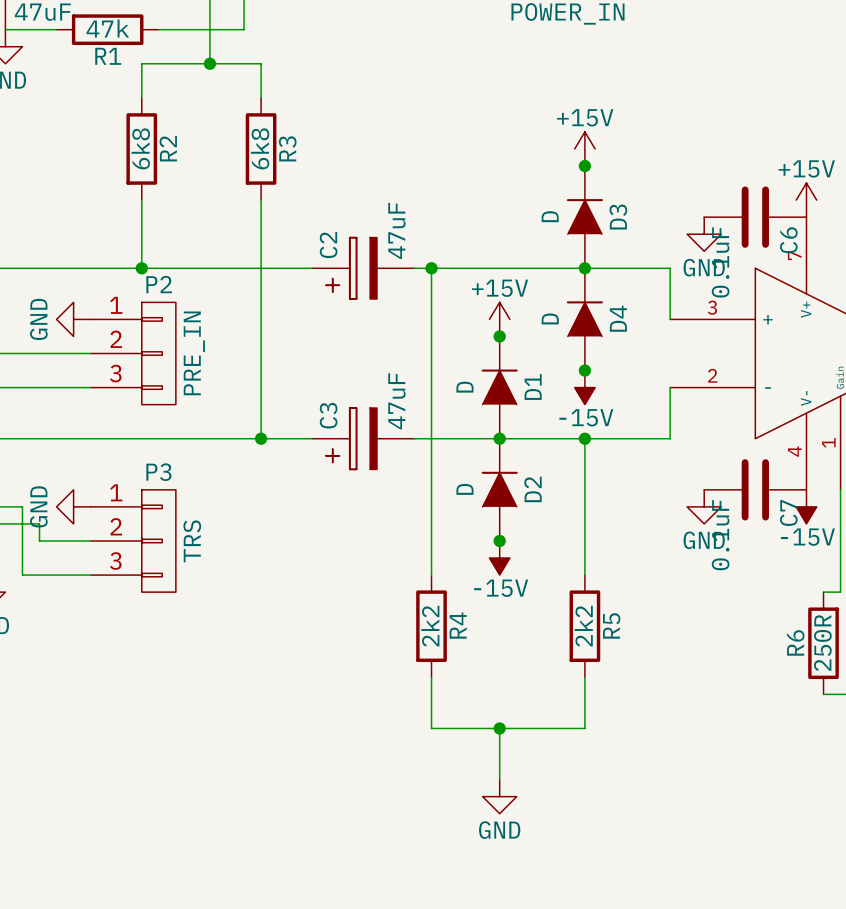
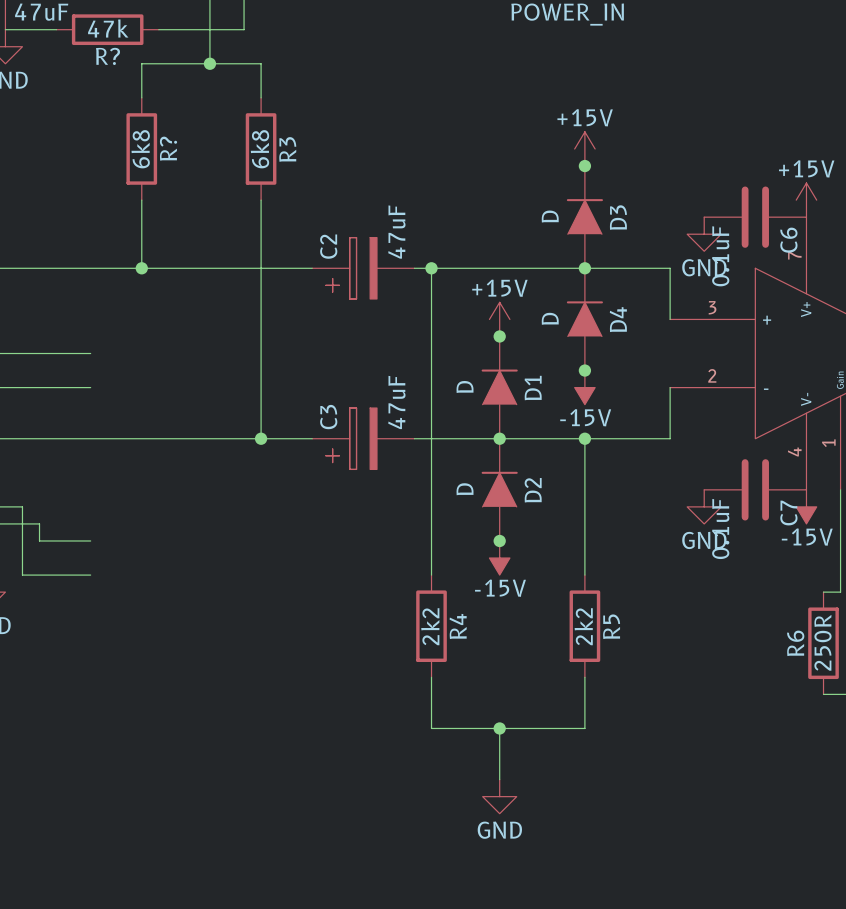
R1 name: R1 (108, 56) -> R? (108, 56)
R2 name: R2 (168, 148) -> R? (168, 148)
power symbol: GND (73, 319) -> none
P2: PRE_IN (133, 353) -> none
power symbol: GND (73, 506) -> none
P3: TRS (133, 540) -> none

